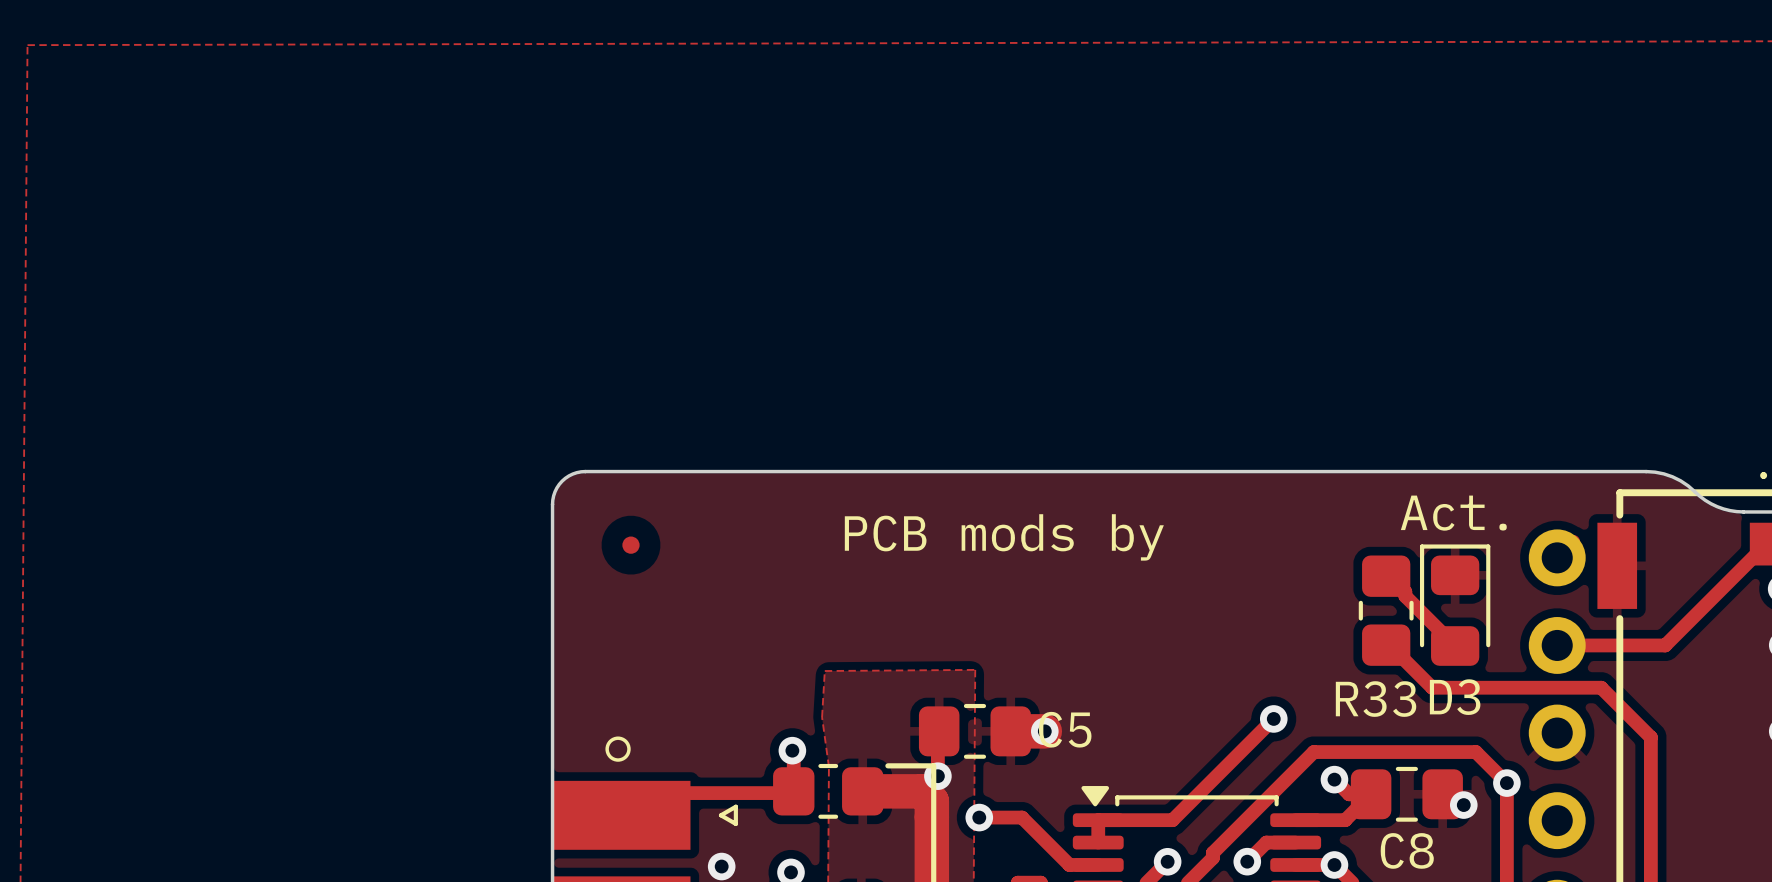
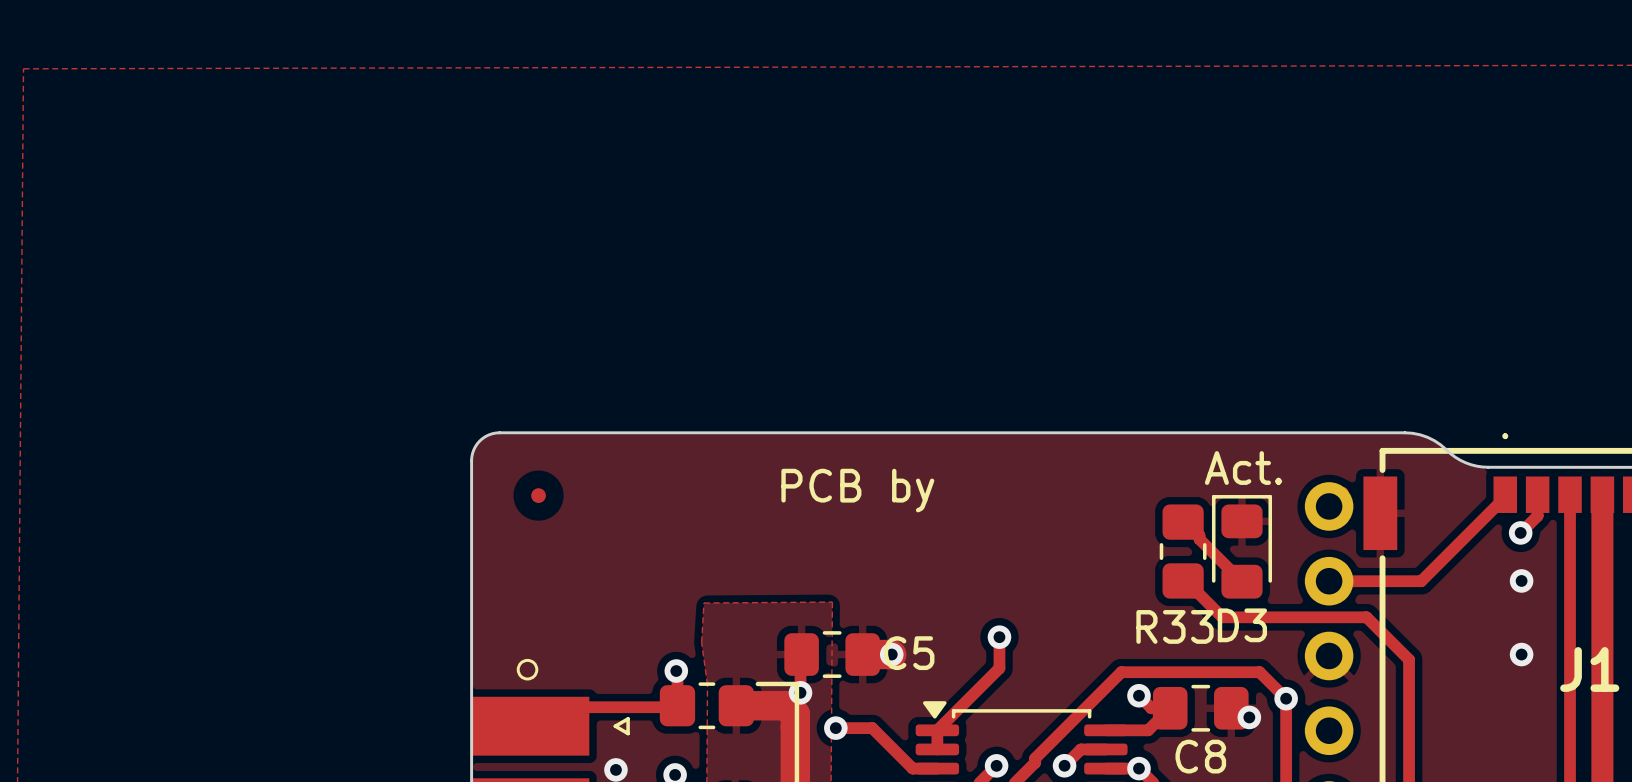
text: PCB mods by (1004, 537) -> PCB by (857, 490)
track: (1273, 718) (1172, 820) (1098, 820) -> (999, 637) (999, 668) (937, 730)
via position: (1273, 718) -> (999, 637)

